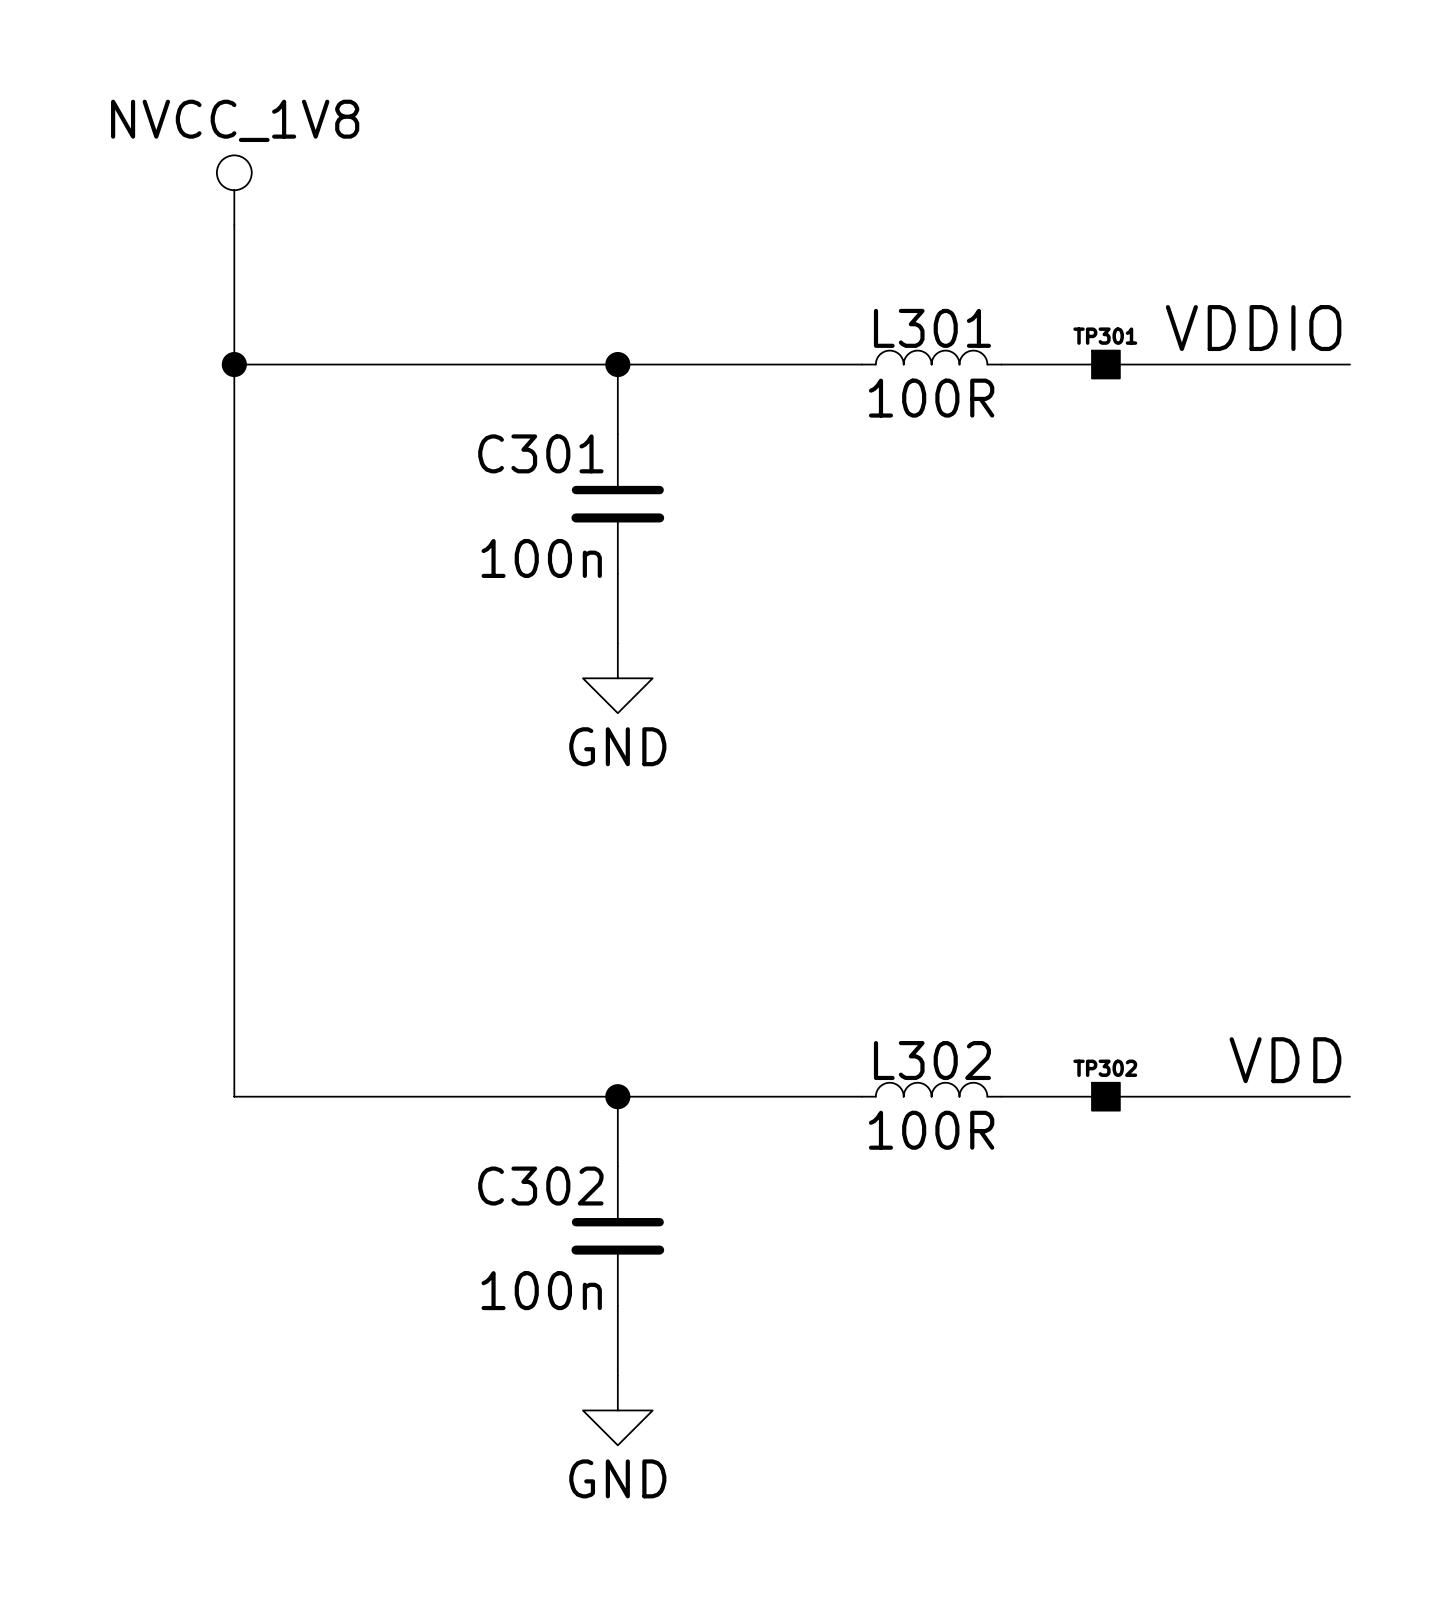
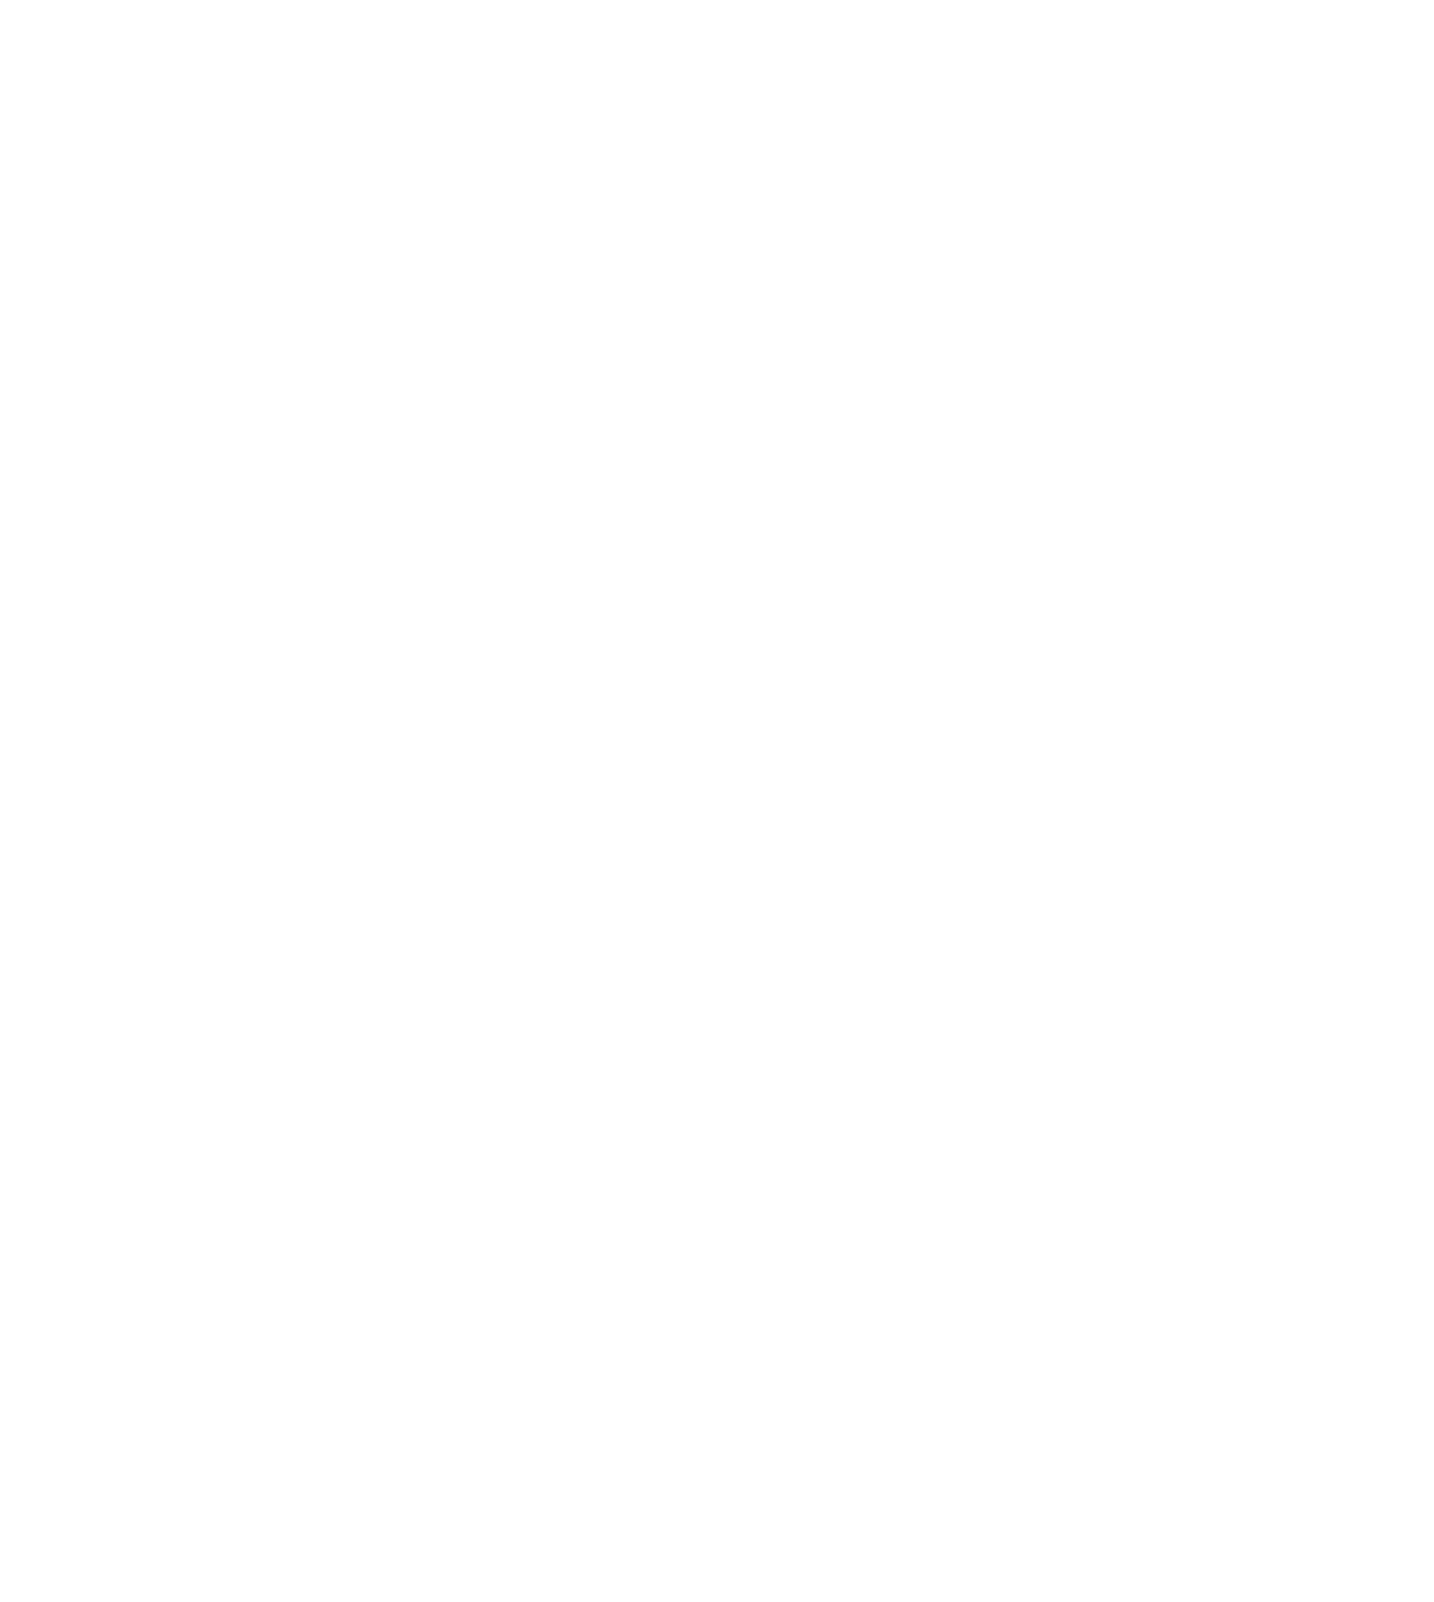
power symbol: NVCC_1V8 (234, 190) -> none
wire: (234, 225) (234, 1096) (861, 1096) -> none
label: VDDIO (1253, 328) -> none
L301: 100R (931, 357) -> none
wire: (234, 364) (861, 364) -> none
junction: (234, 364) -> none
wire: (617, 364) (617, 434) -> none
junction: (617, 364) -> none
wire: (1001, 364) (1349, 364) -> none
TP301: (1105, 364) -> none
C301: 100n (617, 503) -> none
wire: (617, 573) (617, 643) -> none
power symbol: GND (617, 678) -> none
label: VDD (1285, 1060) -> none
L302: 100R (931, 1089) -> none
wire: (617, 1096) (617, 1166) -> none
junction: (617, 1096) -> none
wire: (1001, 1096) (1349, 1096) -> none
TP302: (1105, 1096) -> none
C302: 100n (617, 1236) -> none
wire: (617, 1305) (617, 1375) -> none
power symbol: GND (617, 1410) -> none

